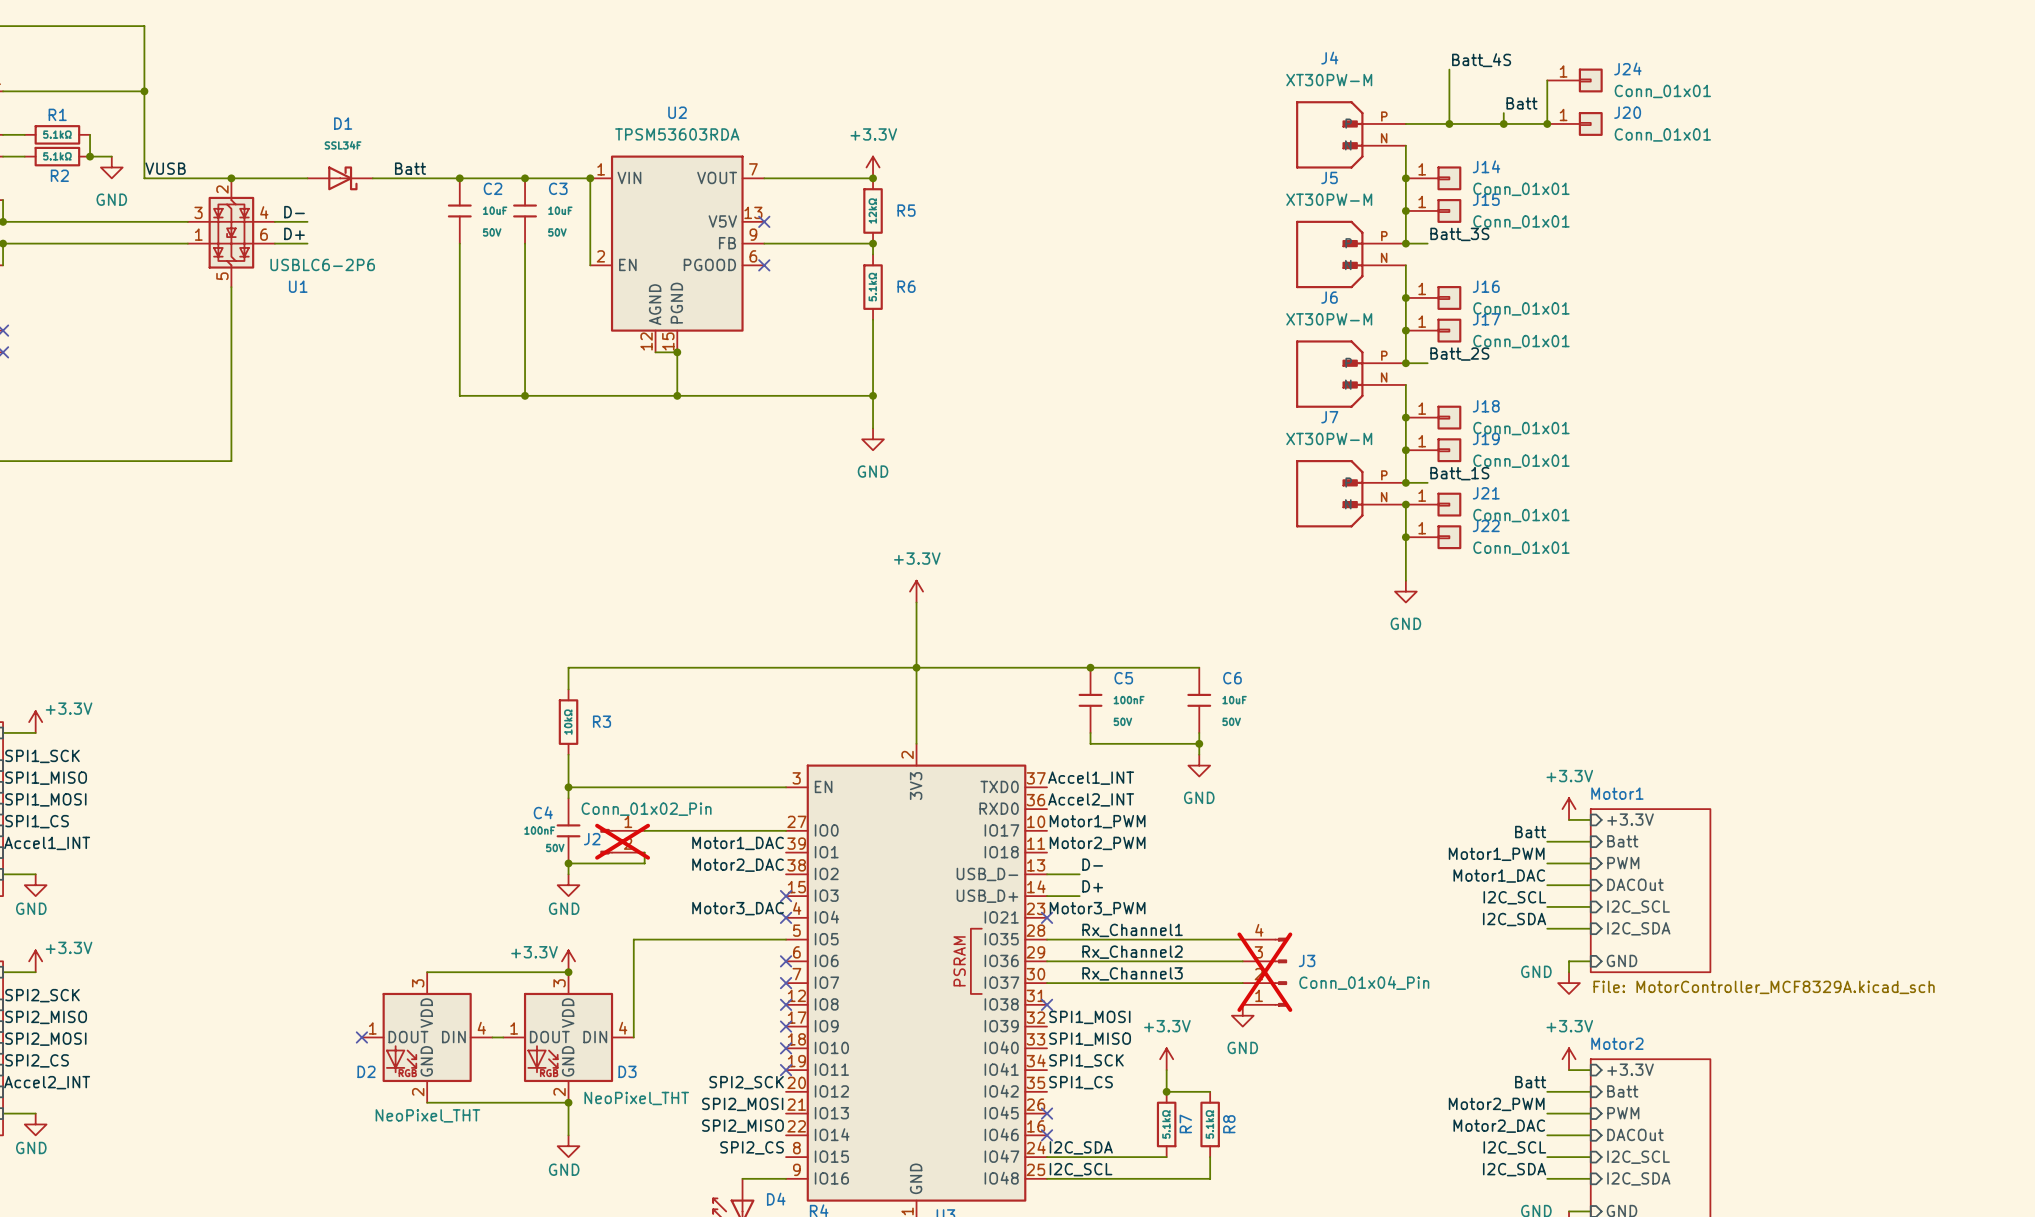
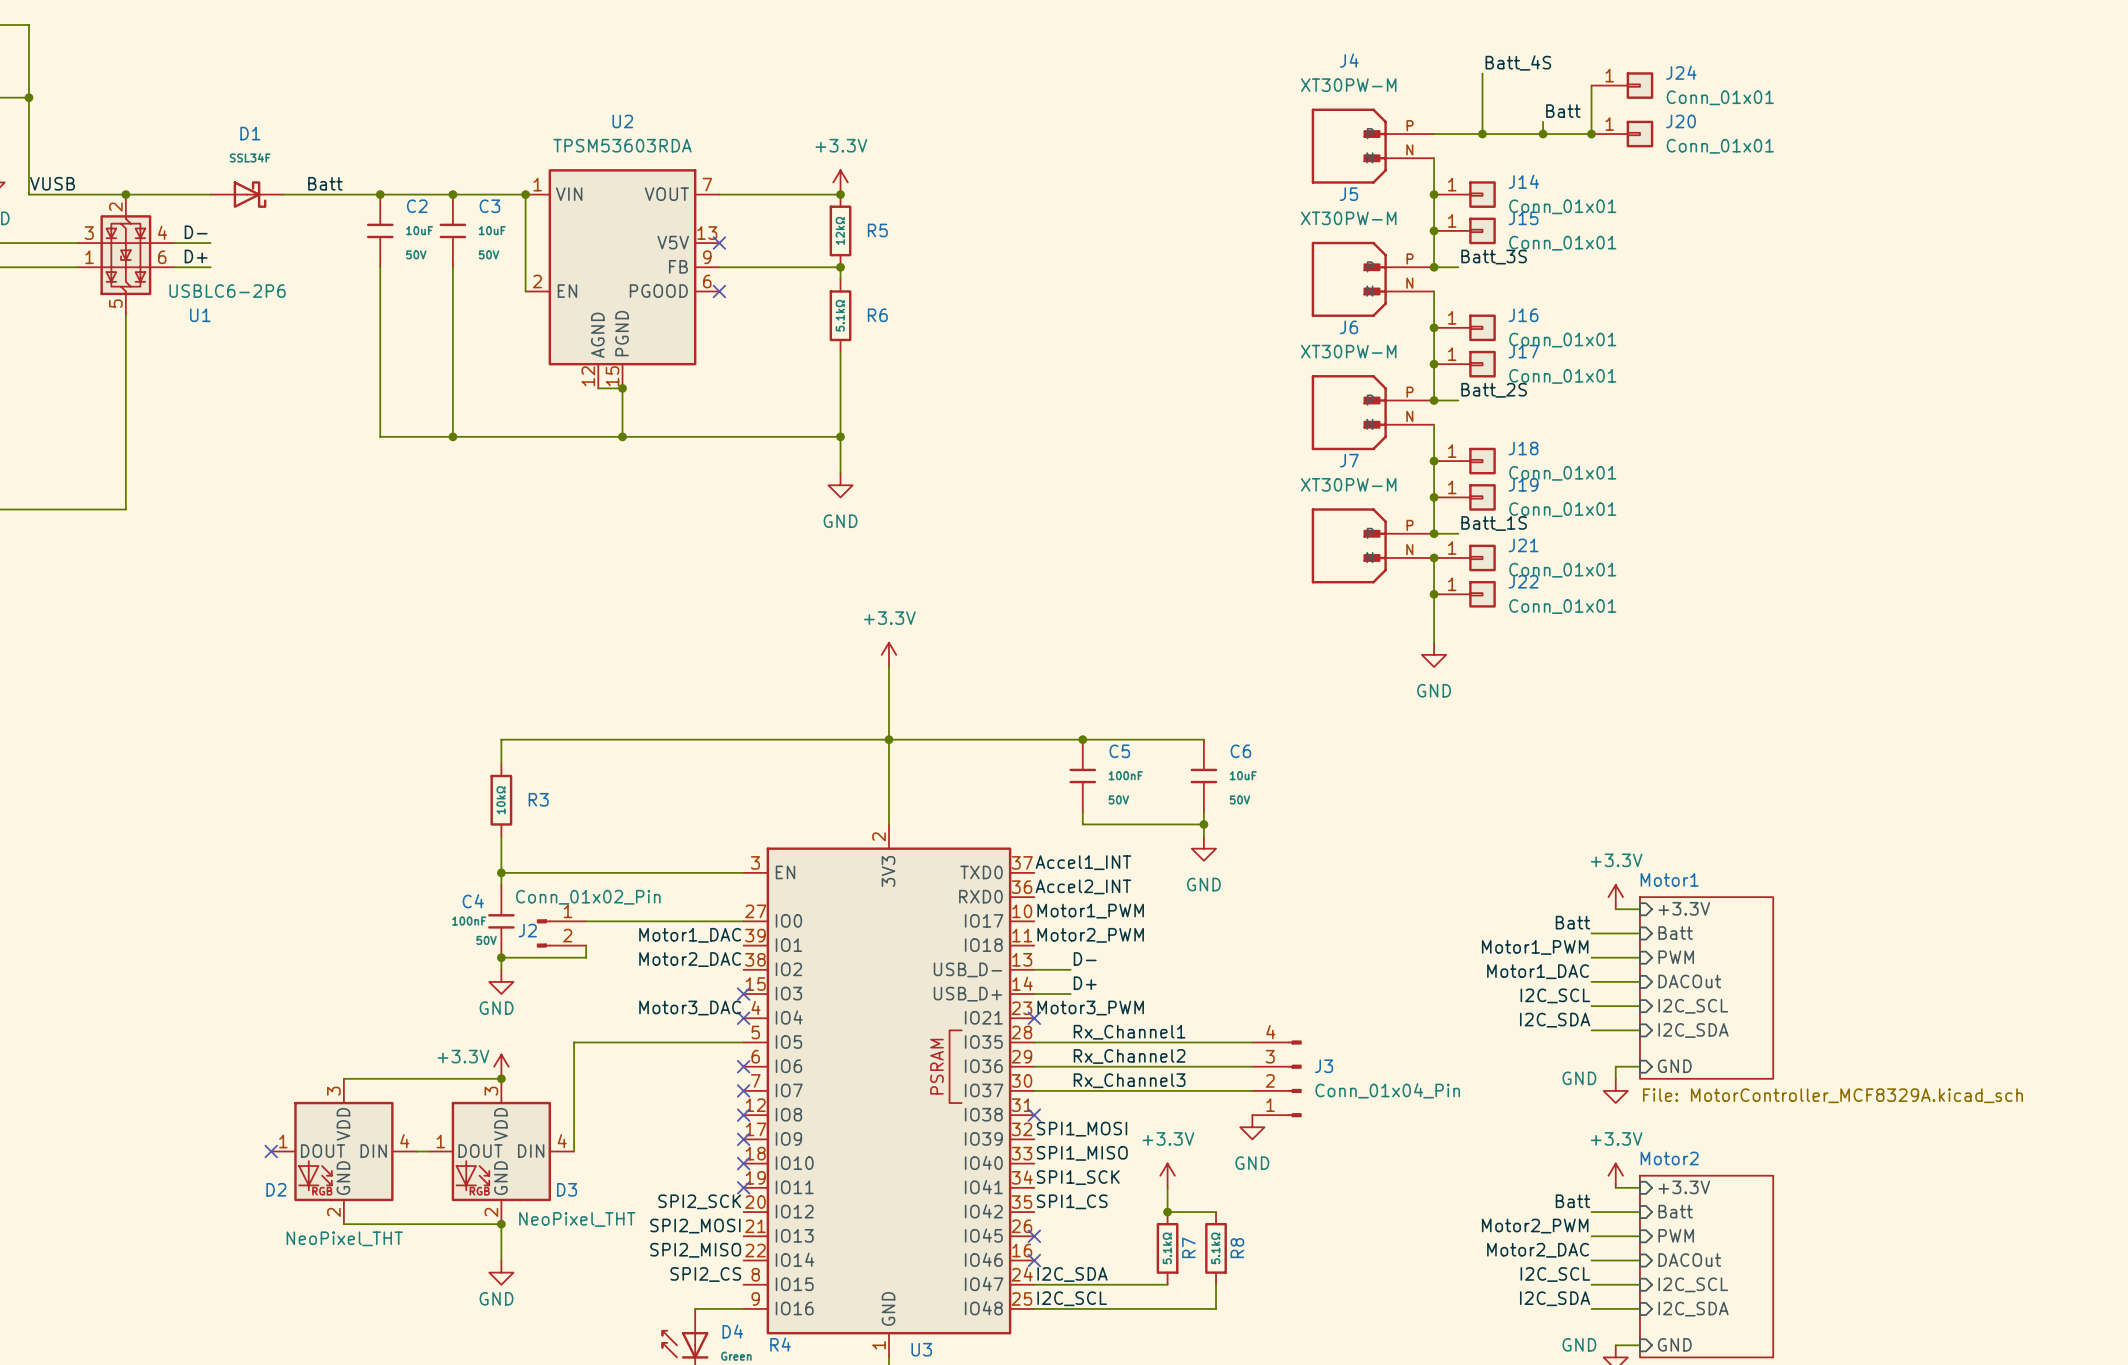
J2 do-not-place cross: (622, 841) -> none
J3 do-not-place cross: (1264, 972) -> none

